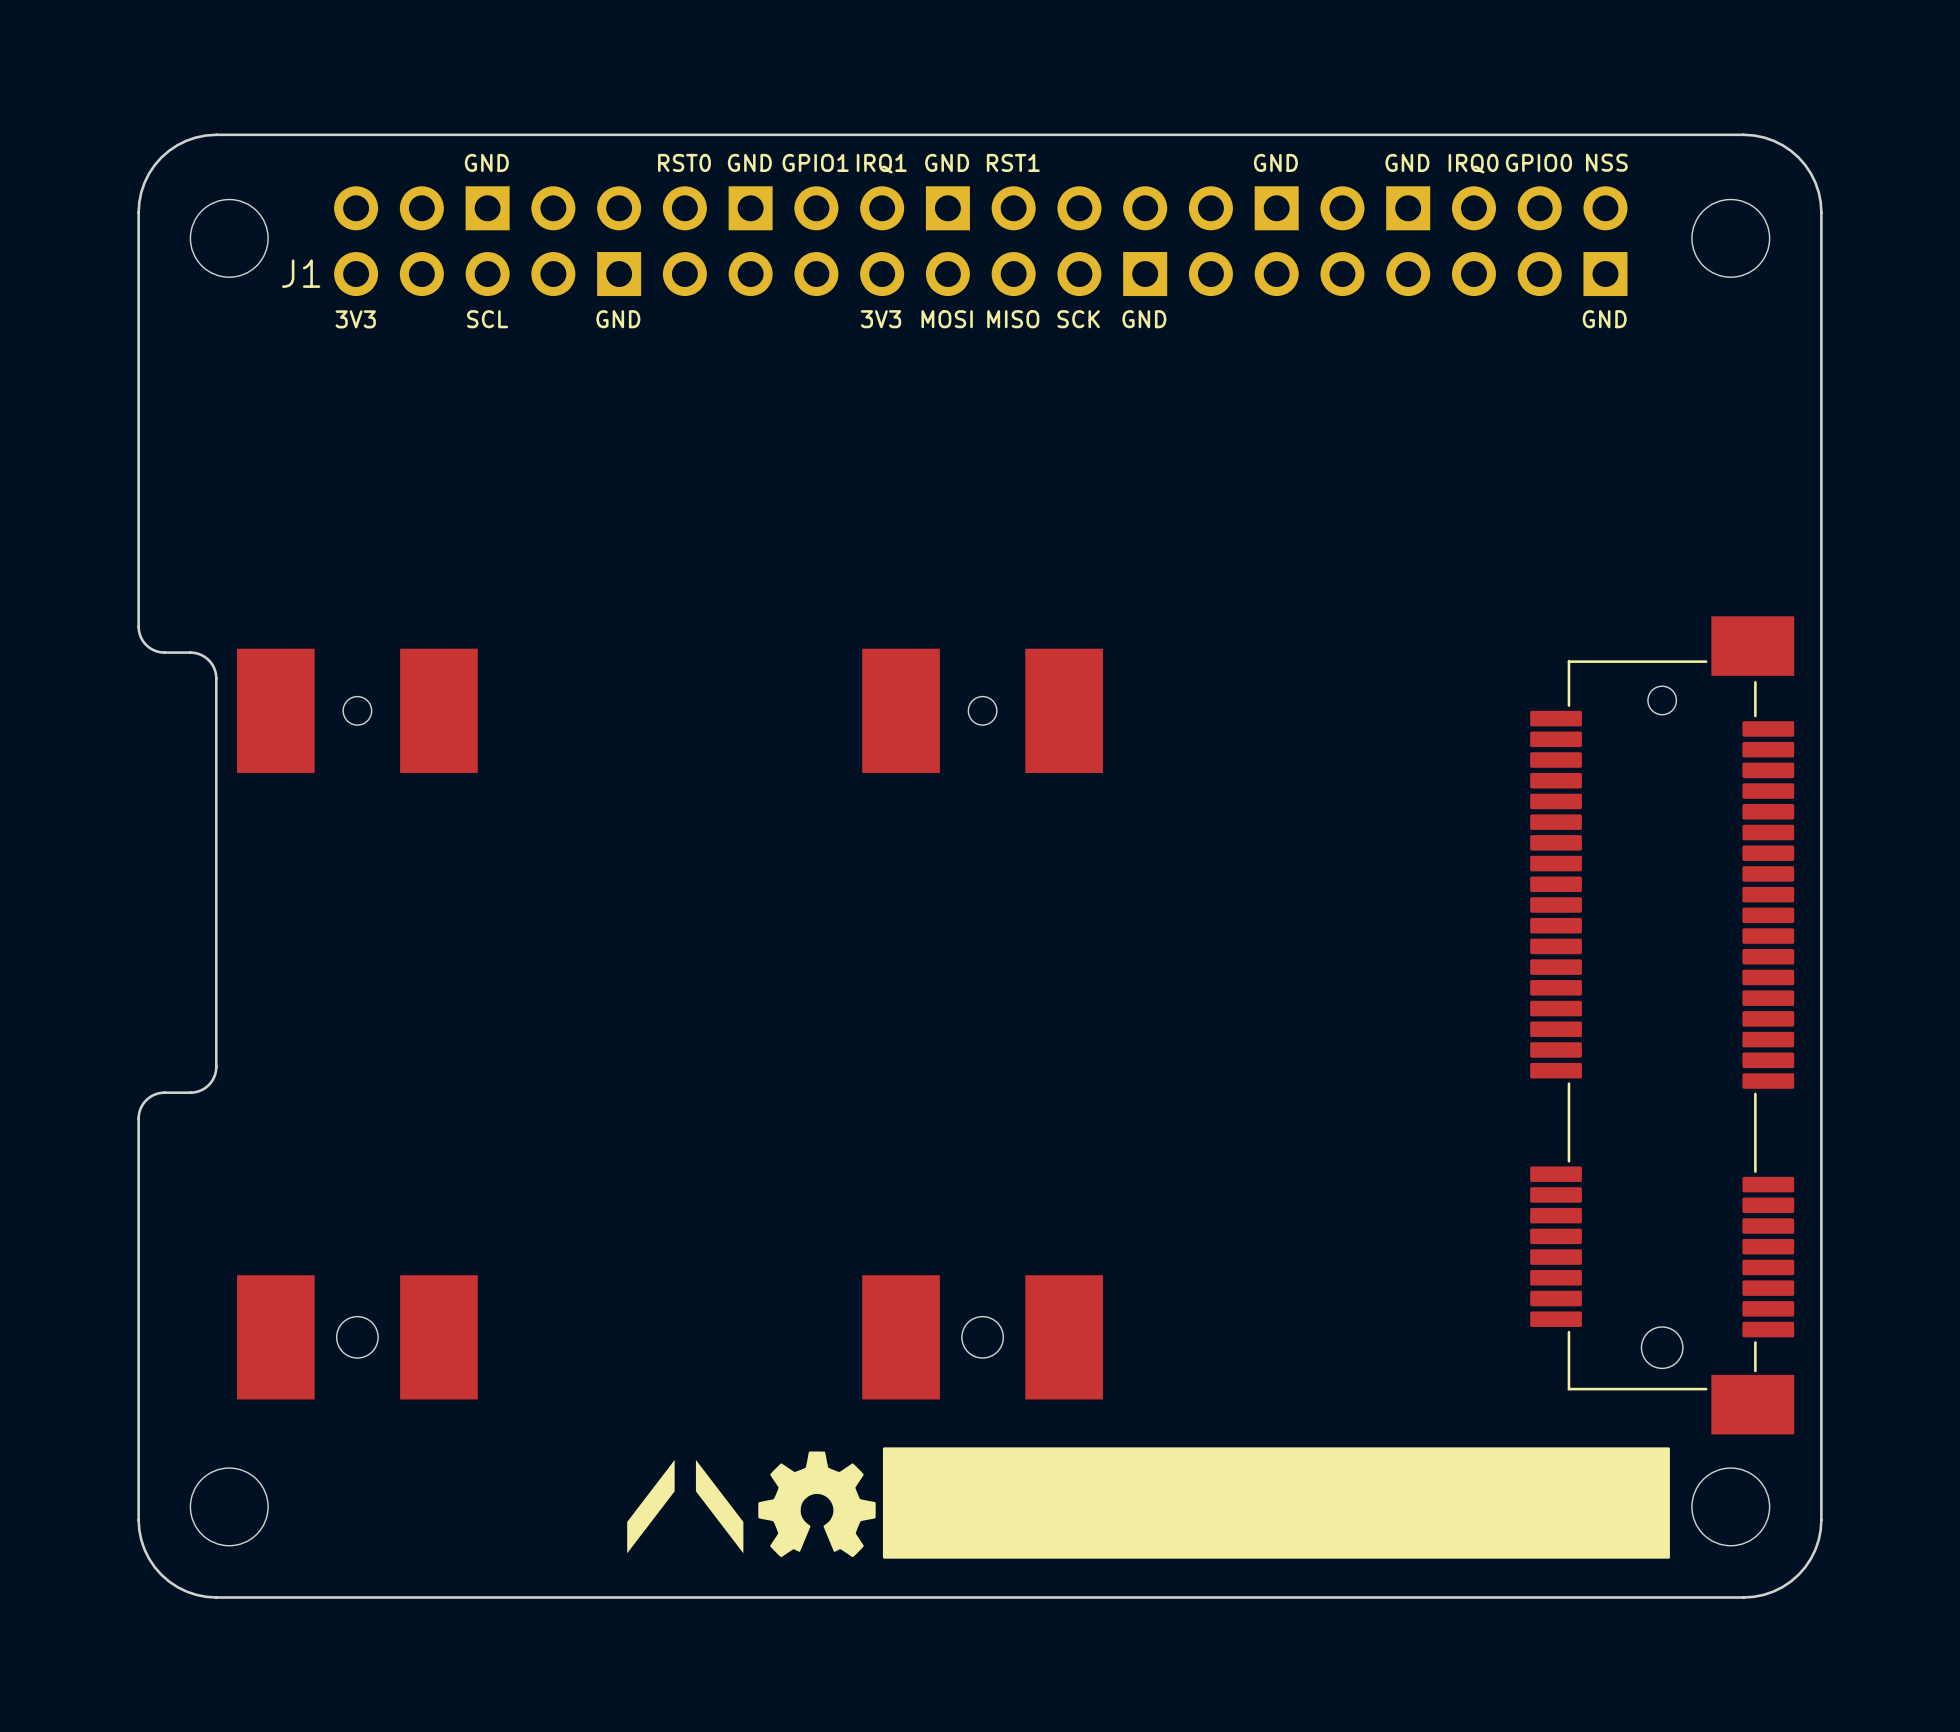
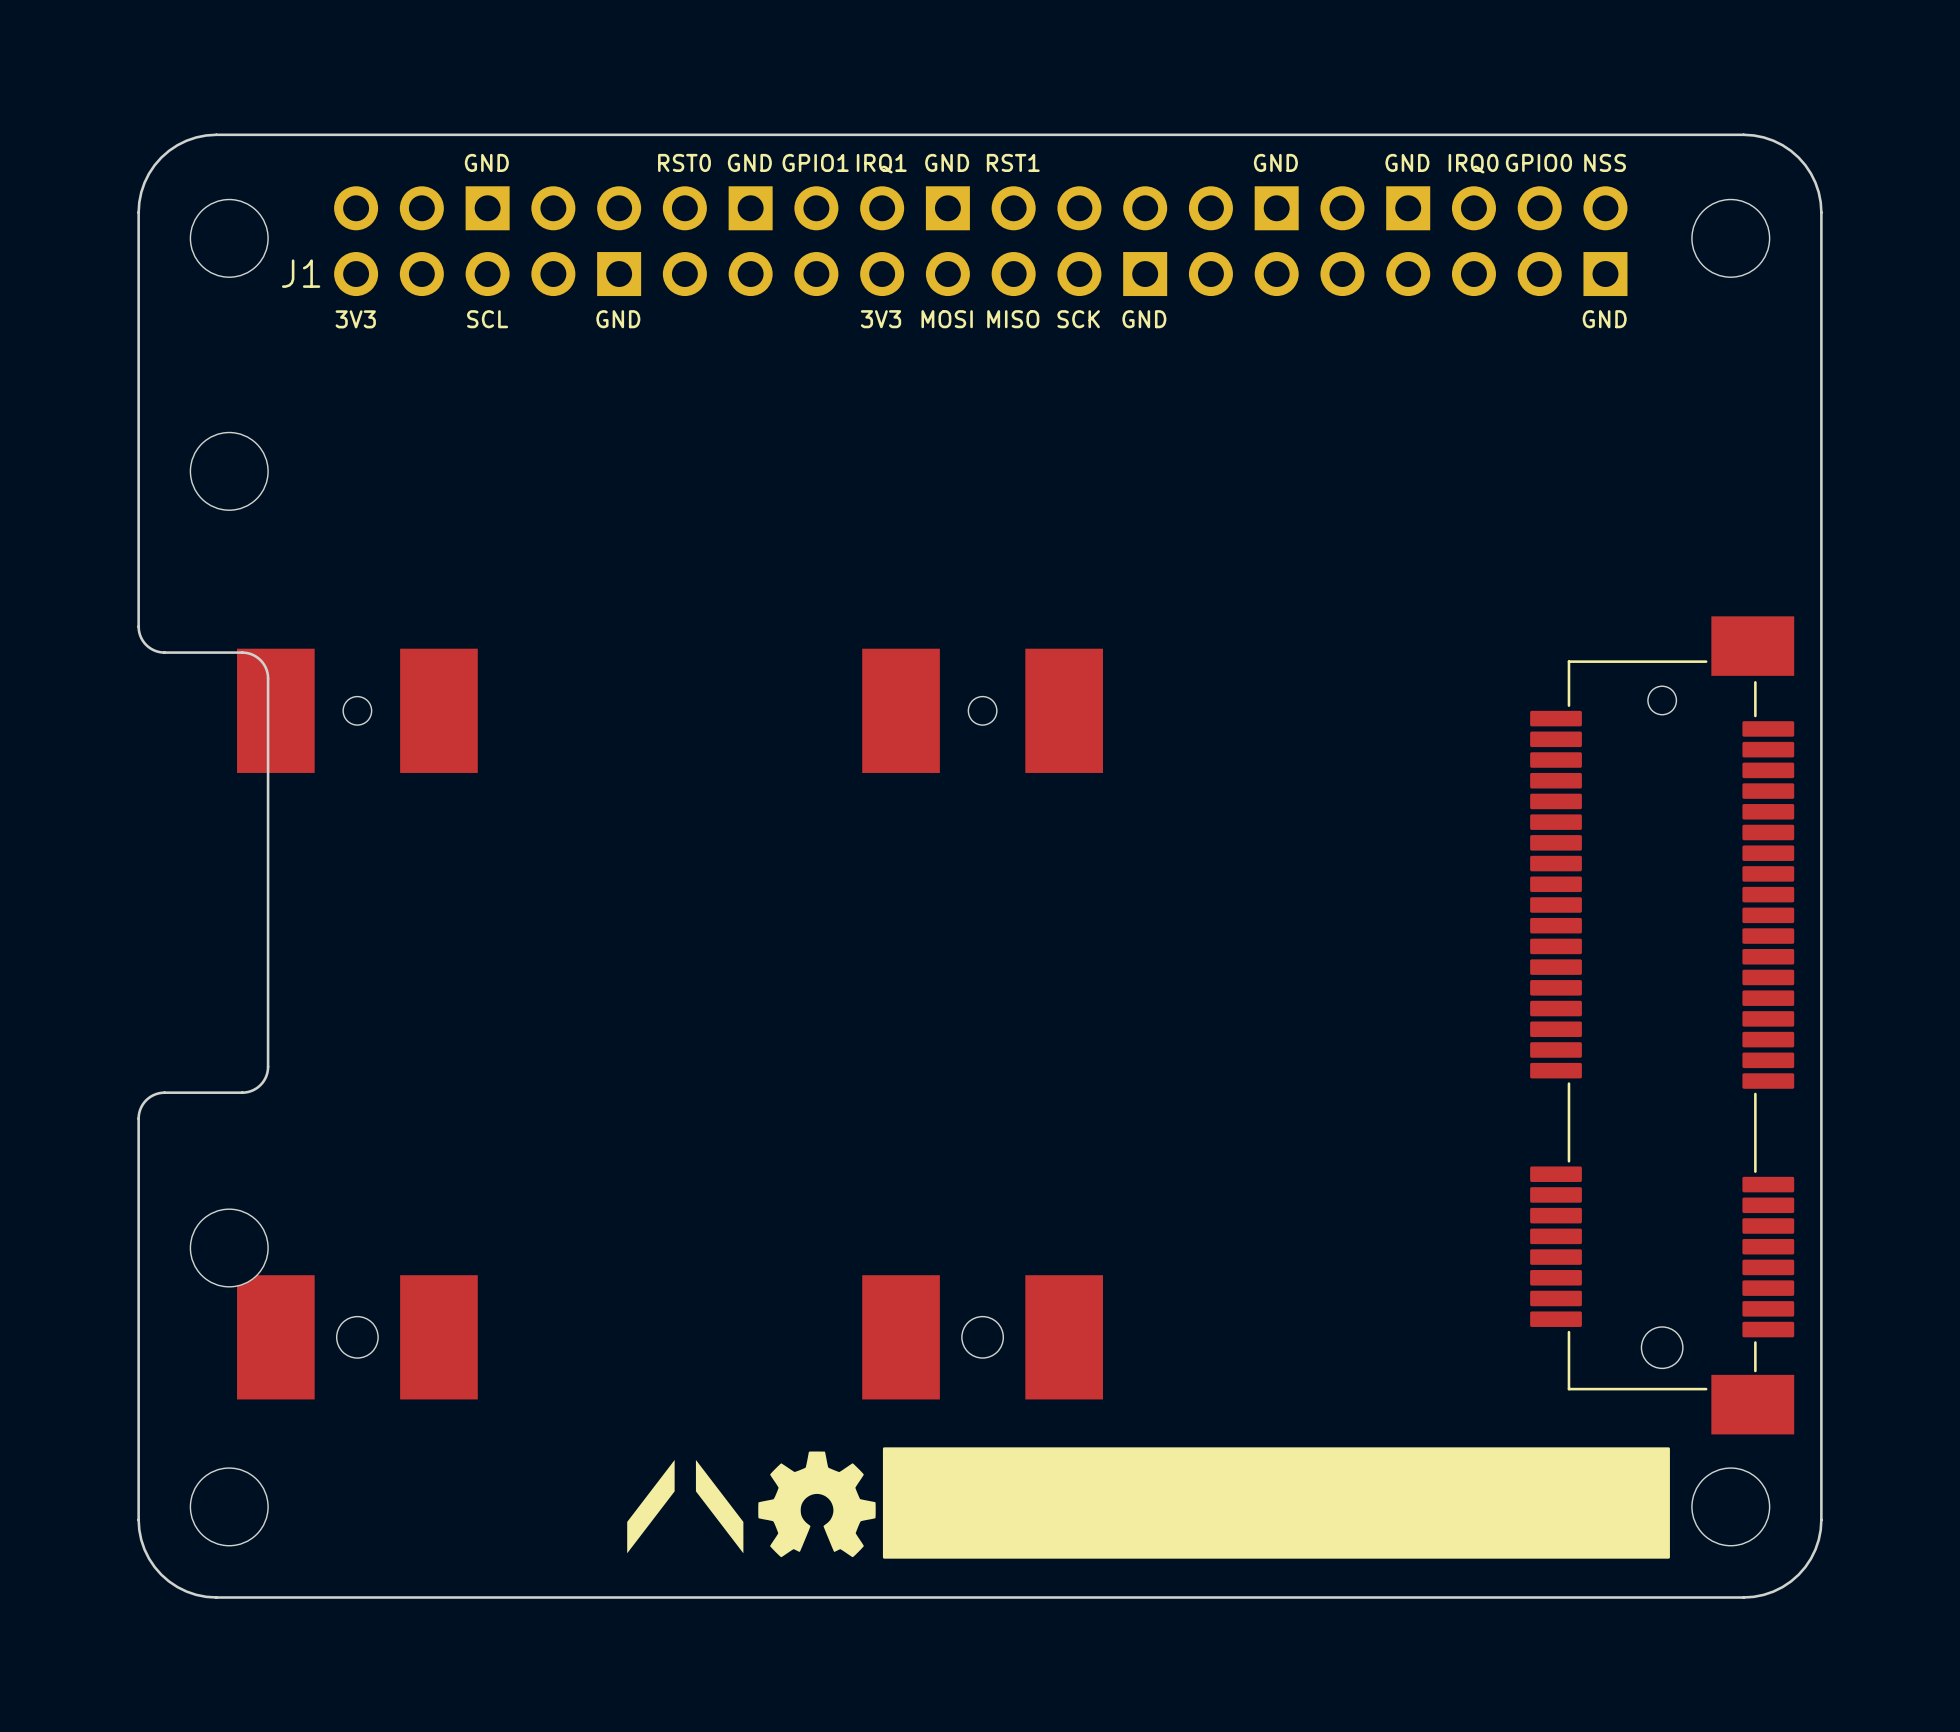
J1 footprint: [137, 133, 1823, 1599] -> [137, 133, 1823, 1599]

